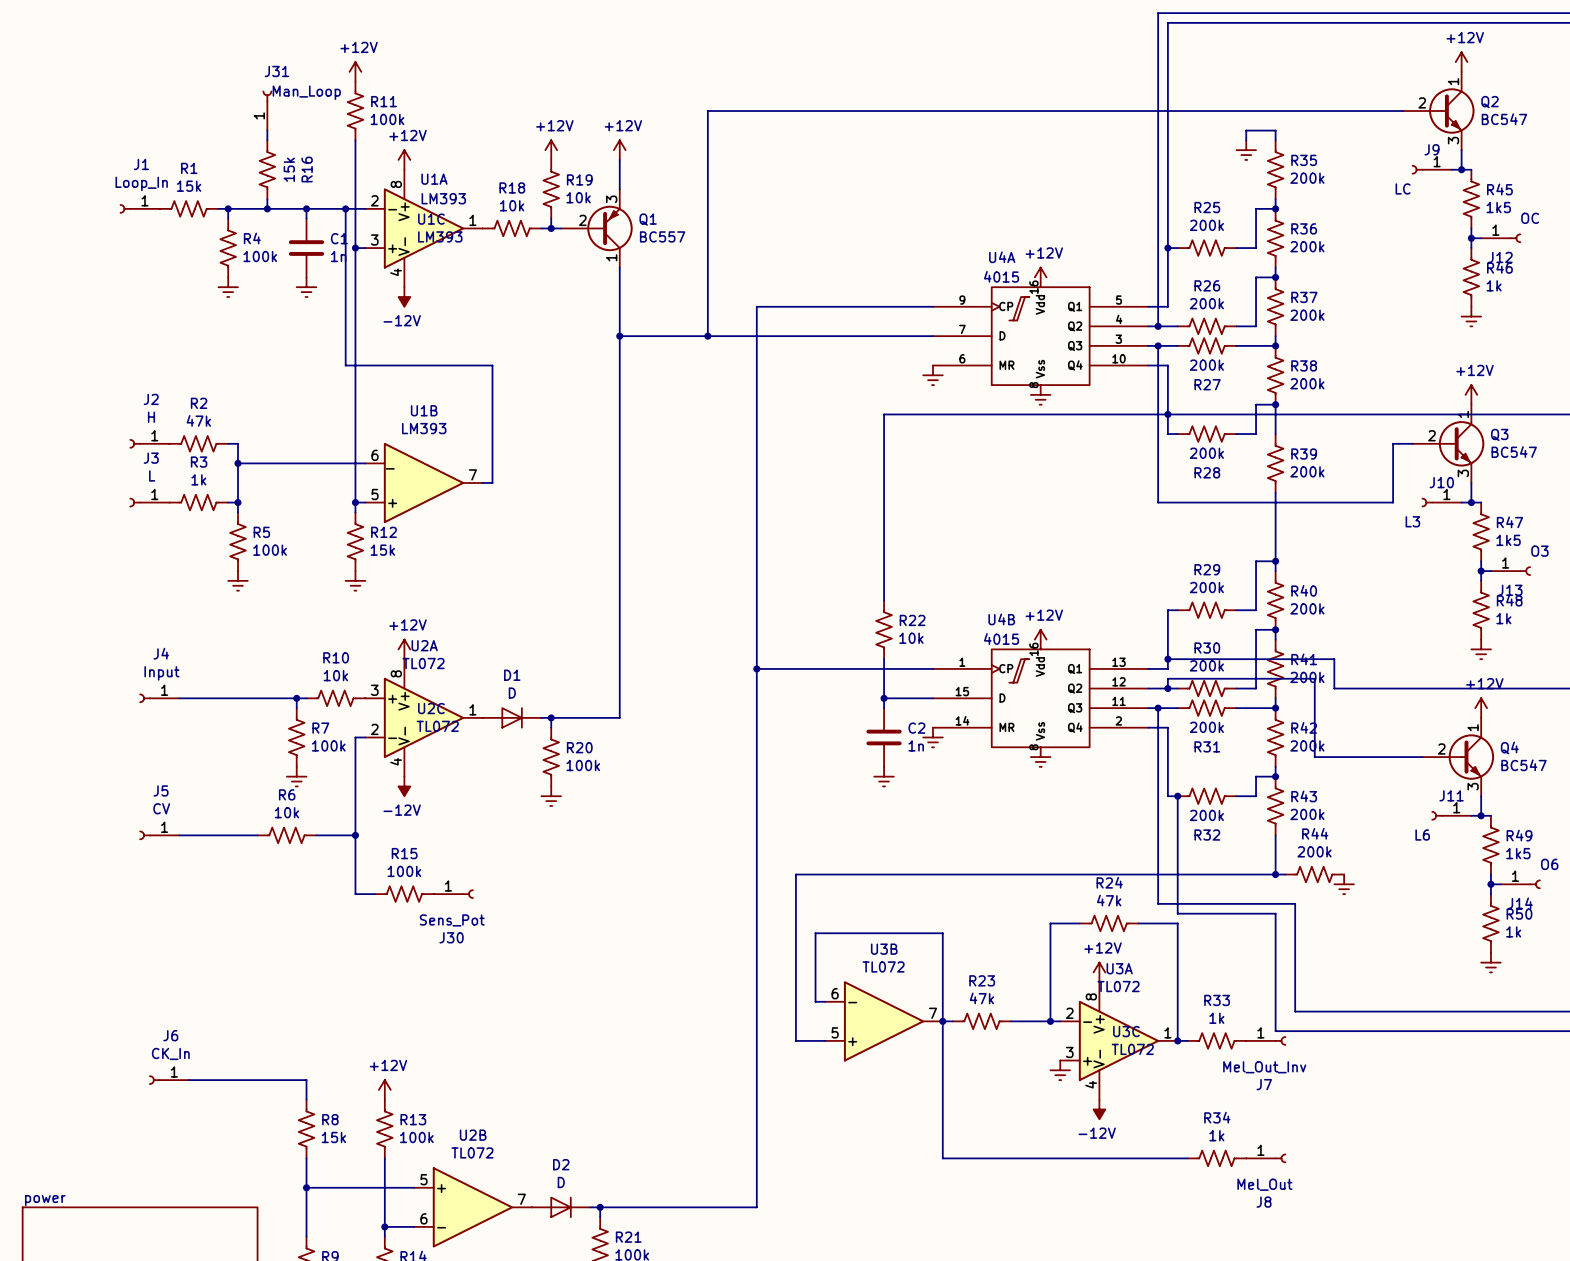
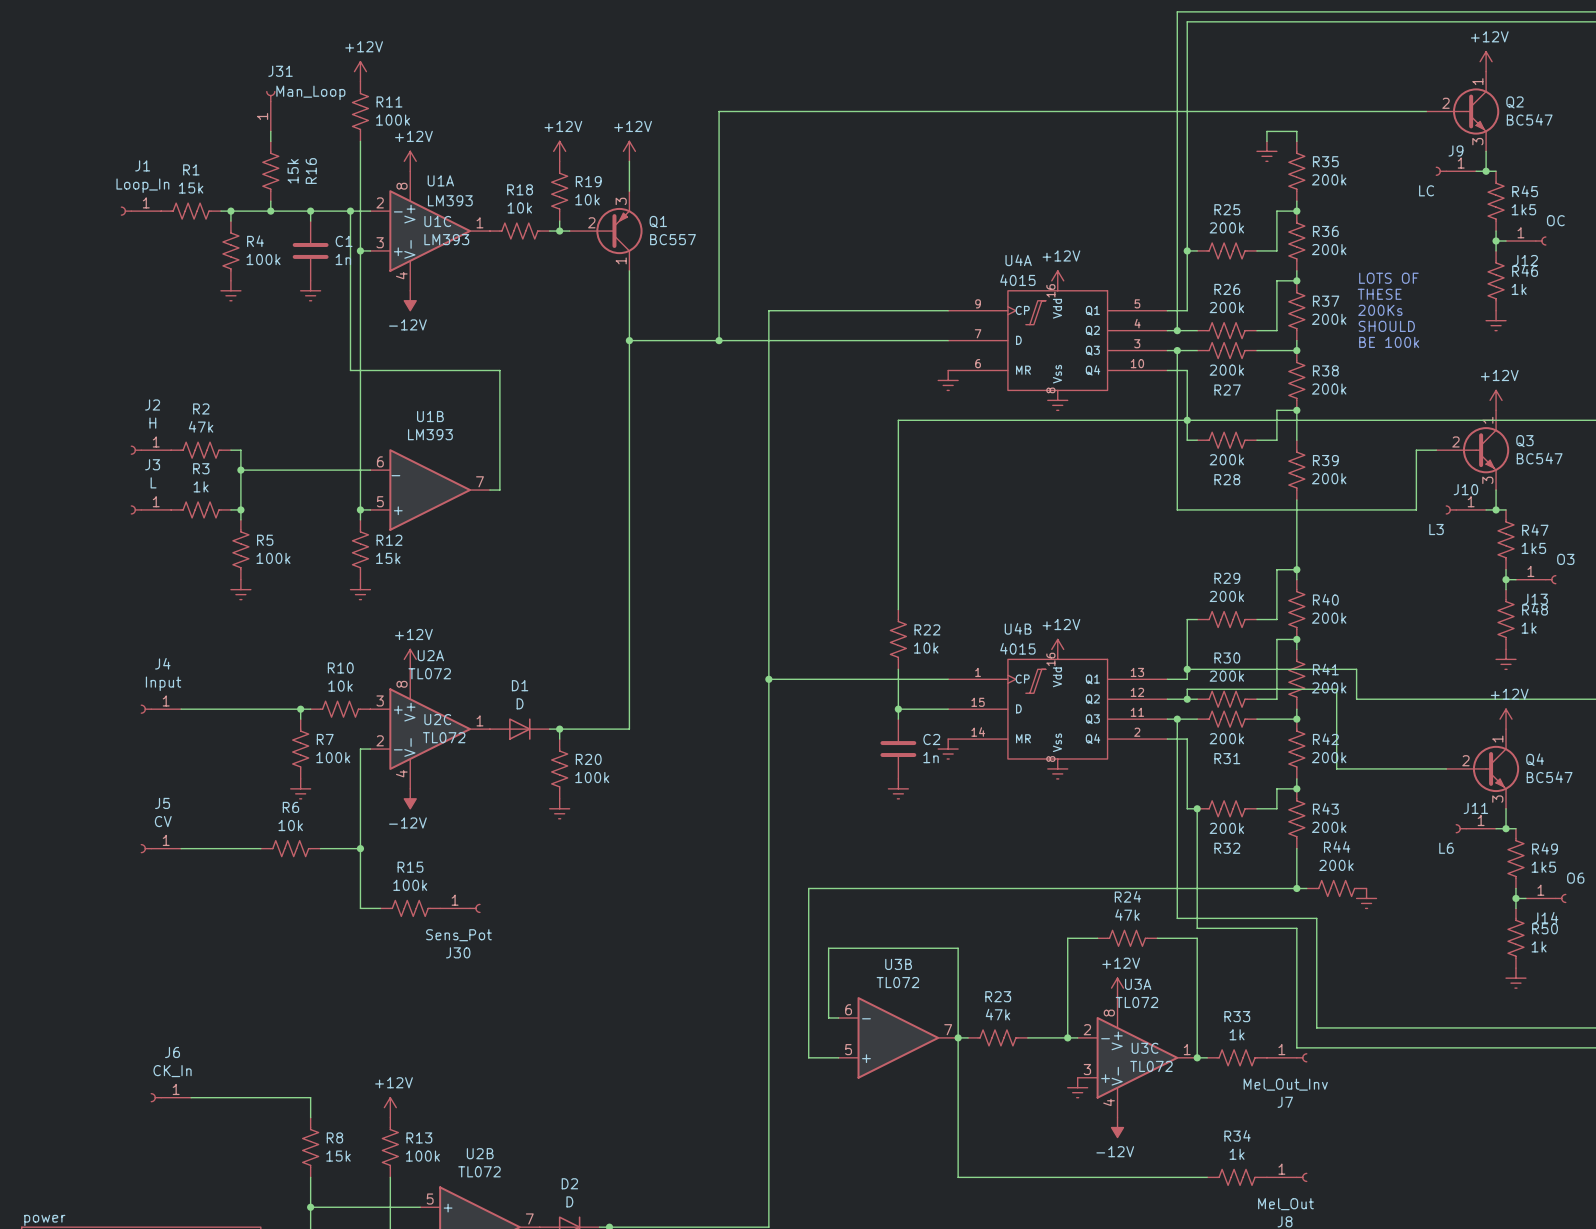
text: none -> LOTS OF (1388, 278)
text: none -> THESE (1379, 294)
text: none -> 200Ks (1380, 310)
text: none -> SHOULD (1386, 326)
text: none -> BE 100k (1389, 342)

